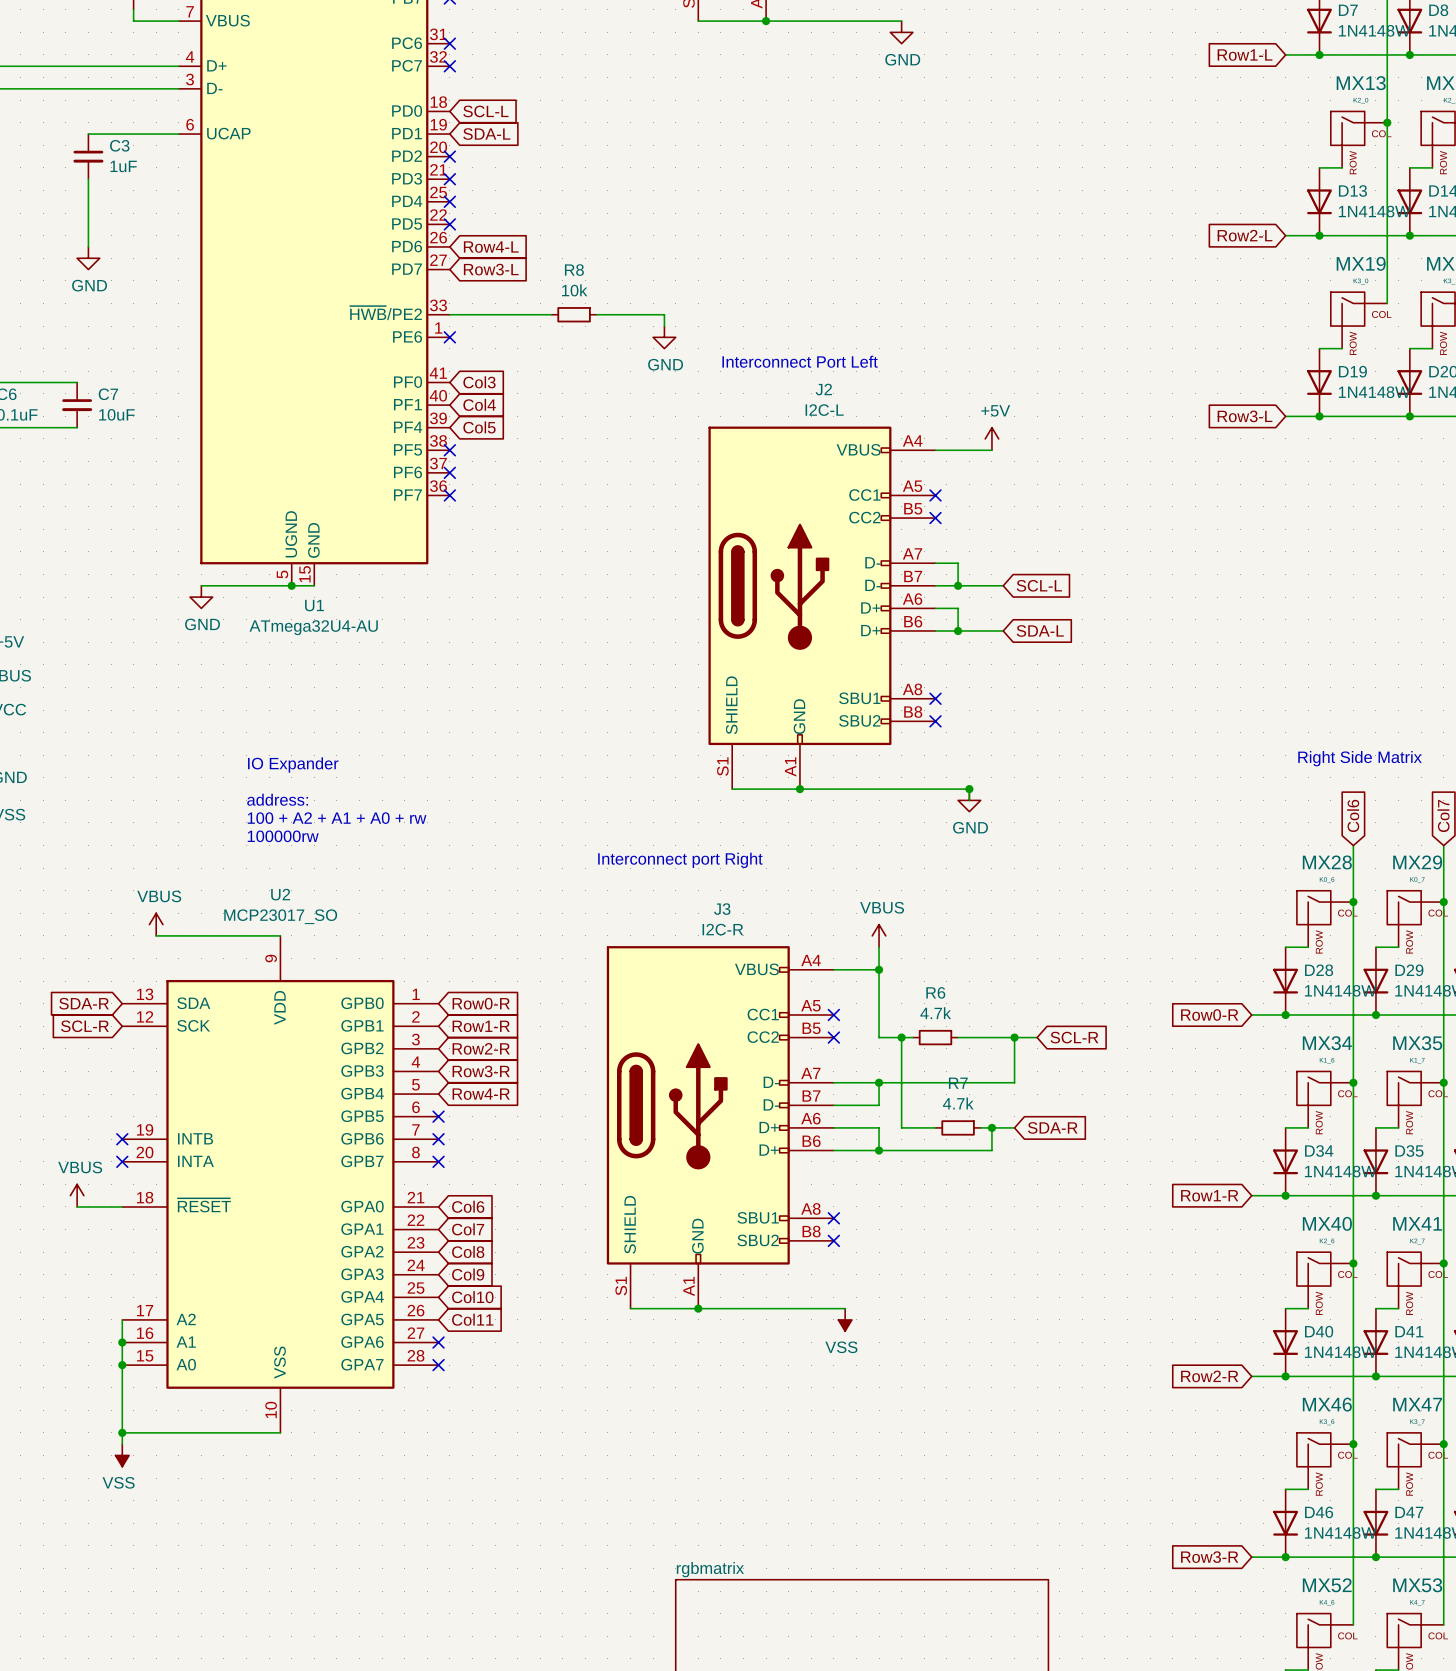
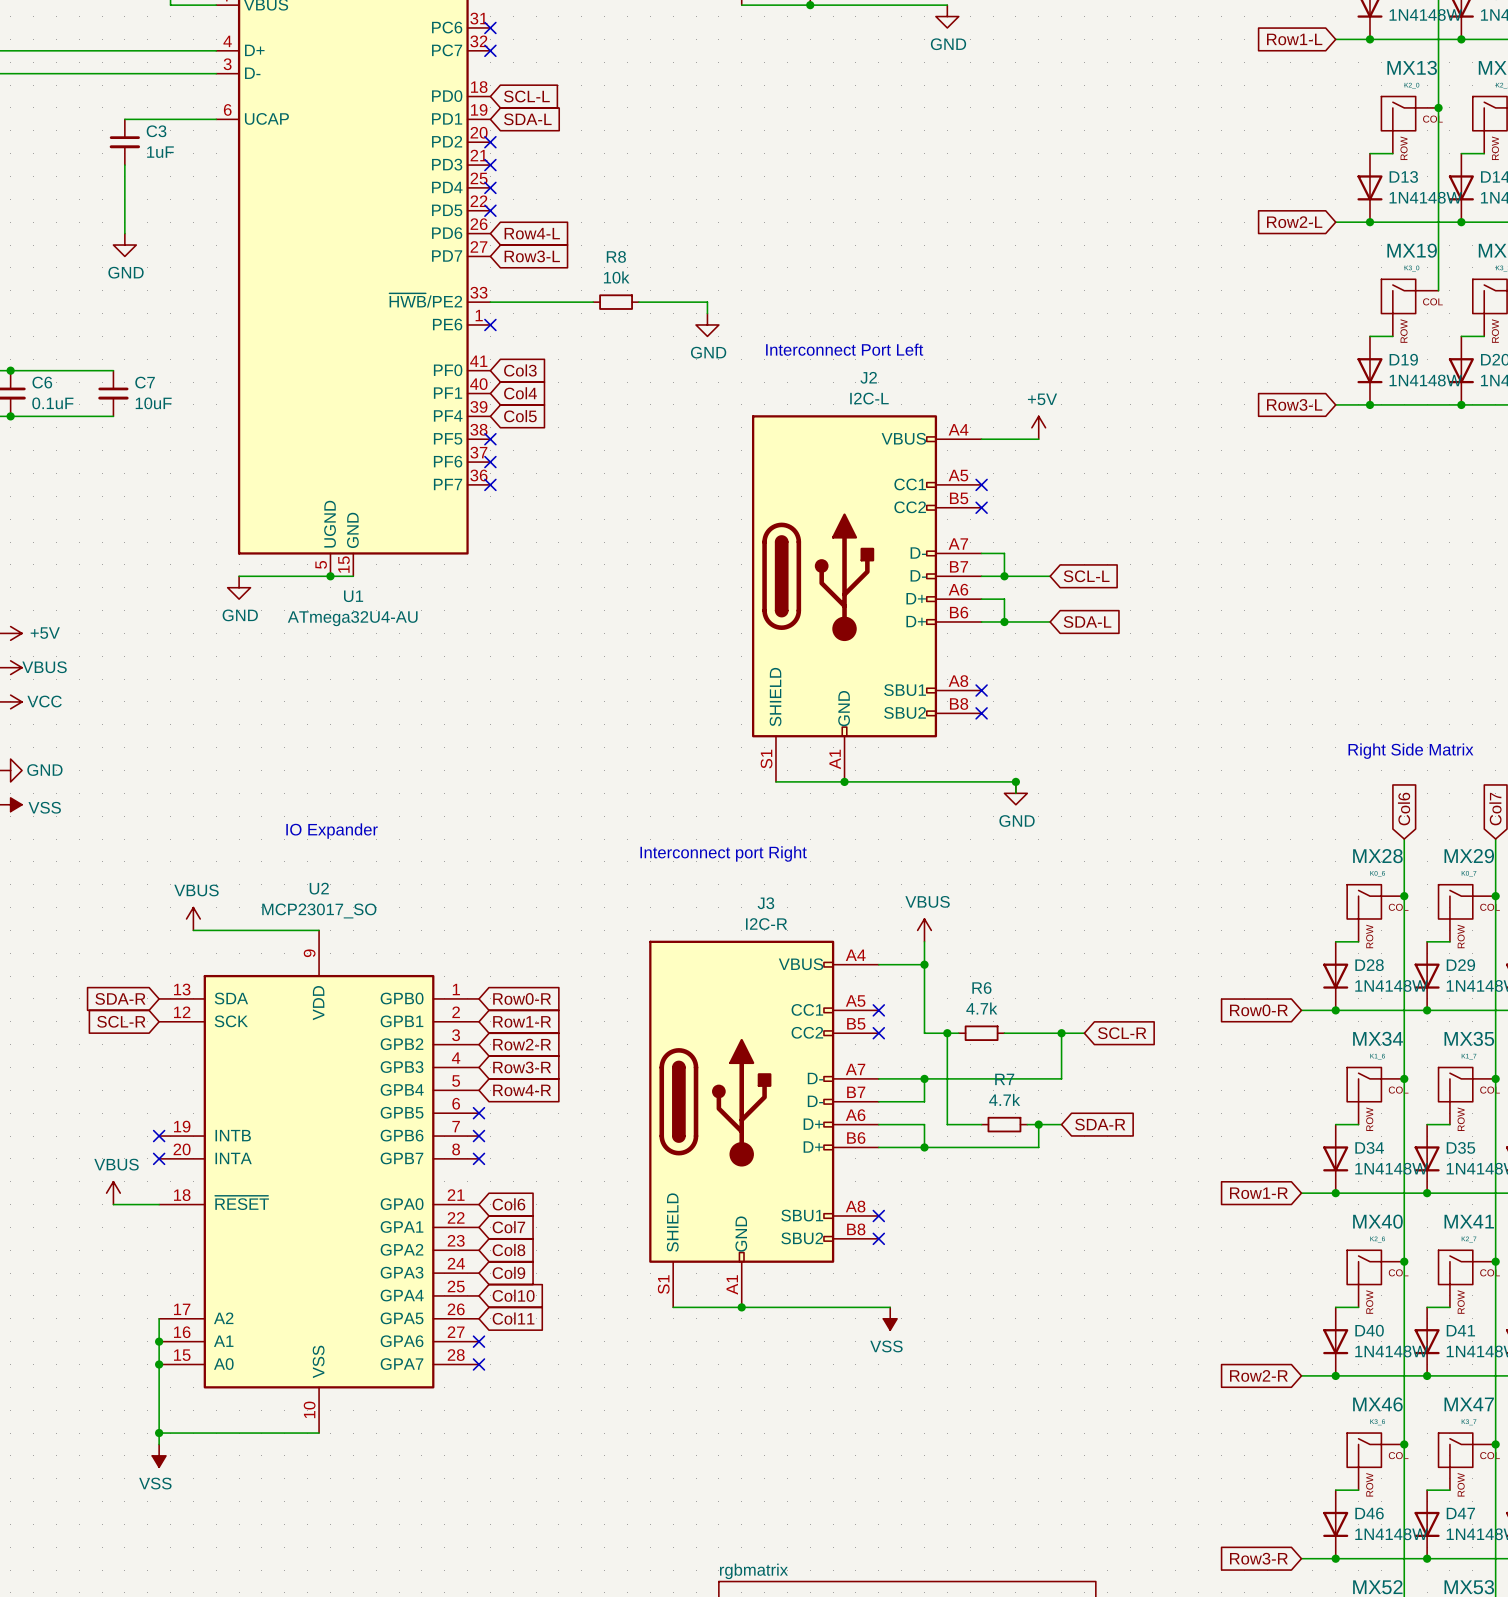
text: IO Expander (293, 764) -> none
text: address: (277, 799) -> none
text: 100 + A2 + A1 + A0 + rw (337, 818) -> none
text: 100000rw (283, 836) -> IO Expander (332, 831)

